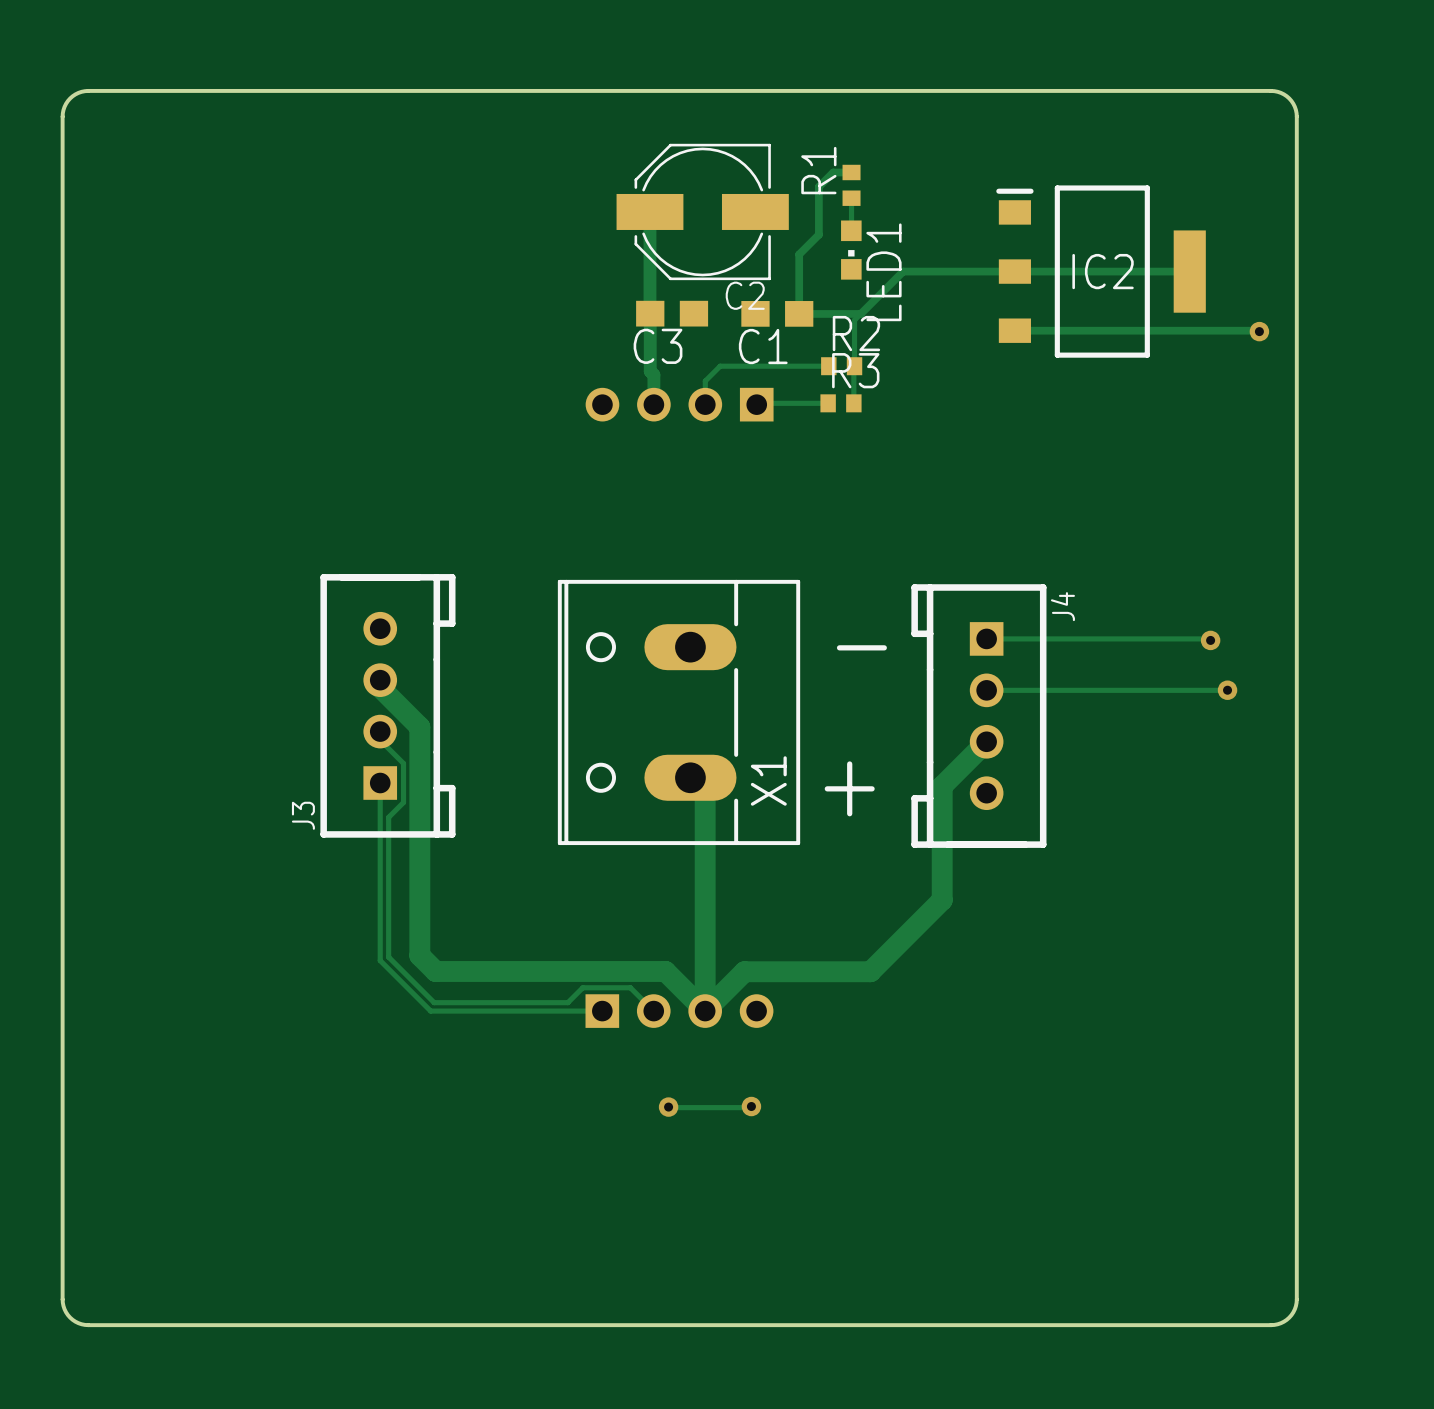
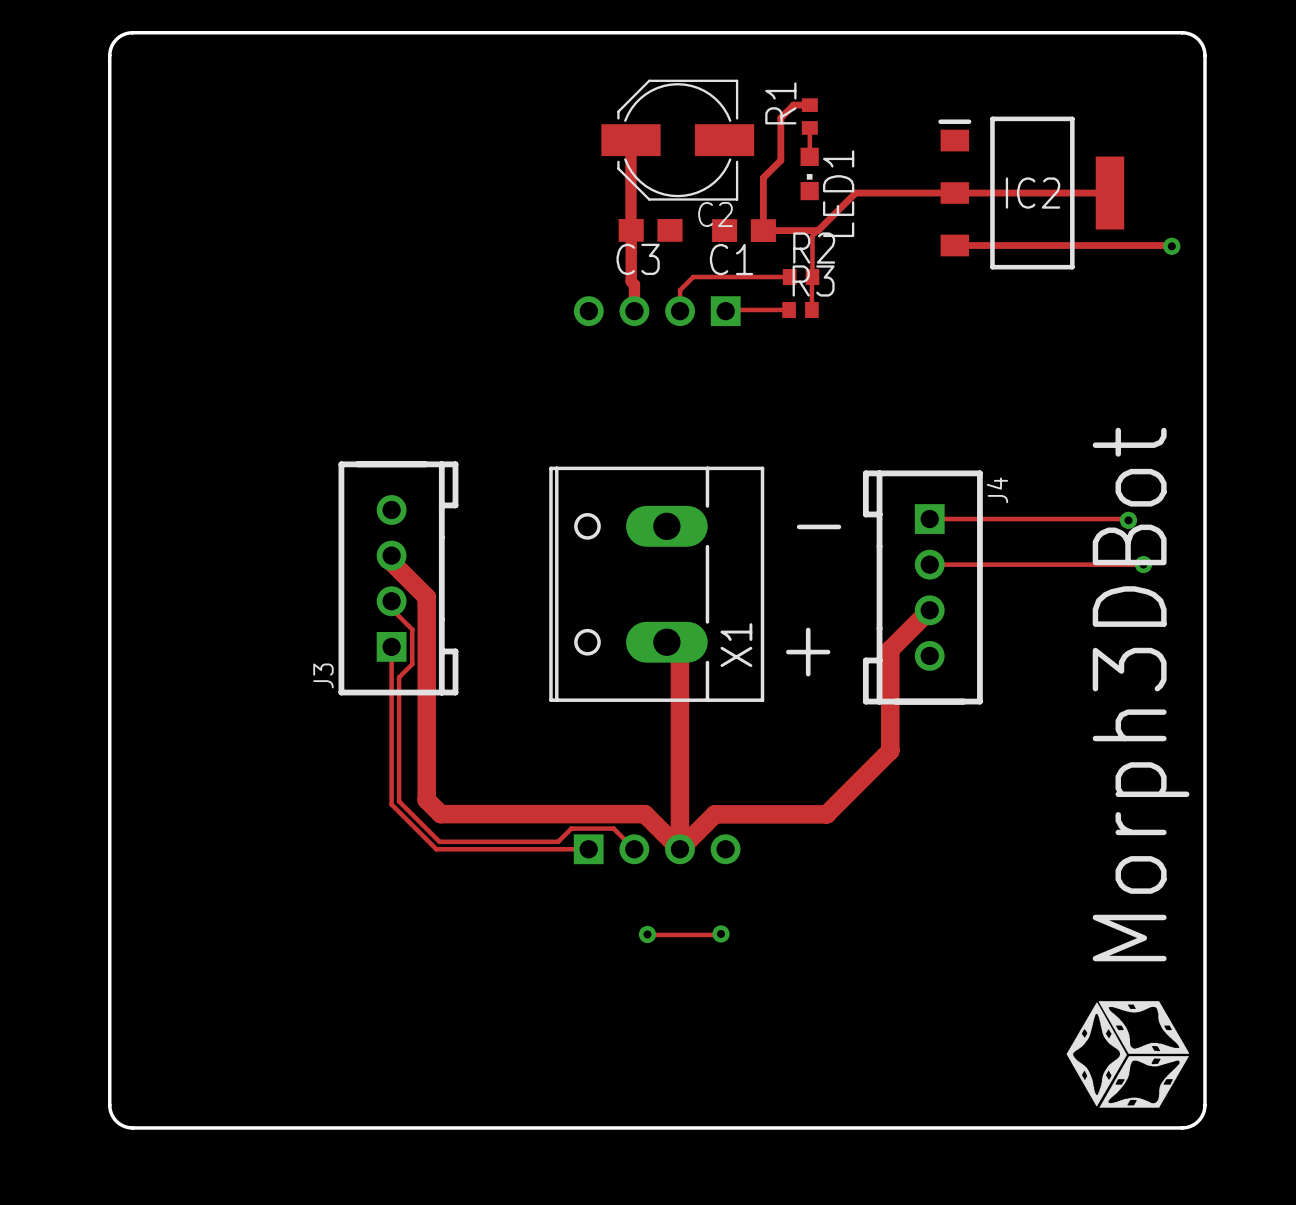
drawing: none -> [1066, 1001, 1190, 1108]

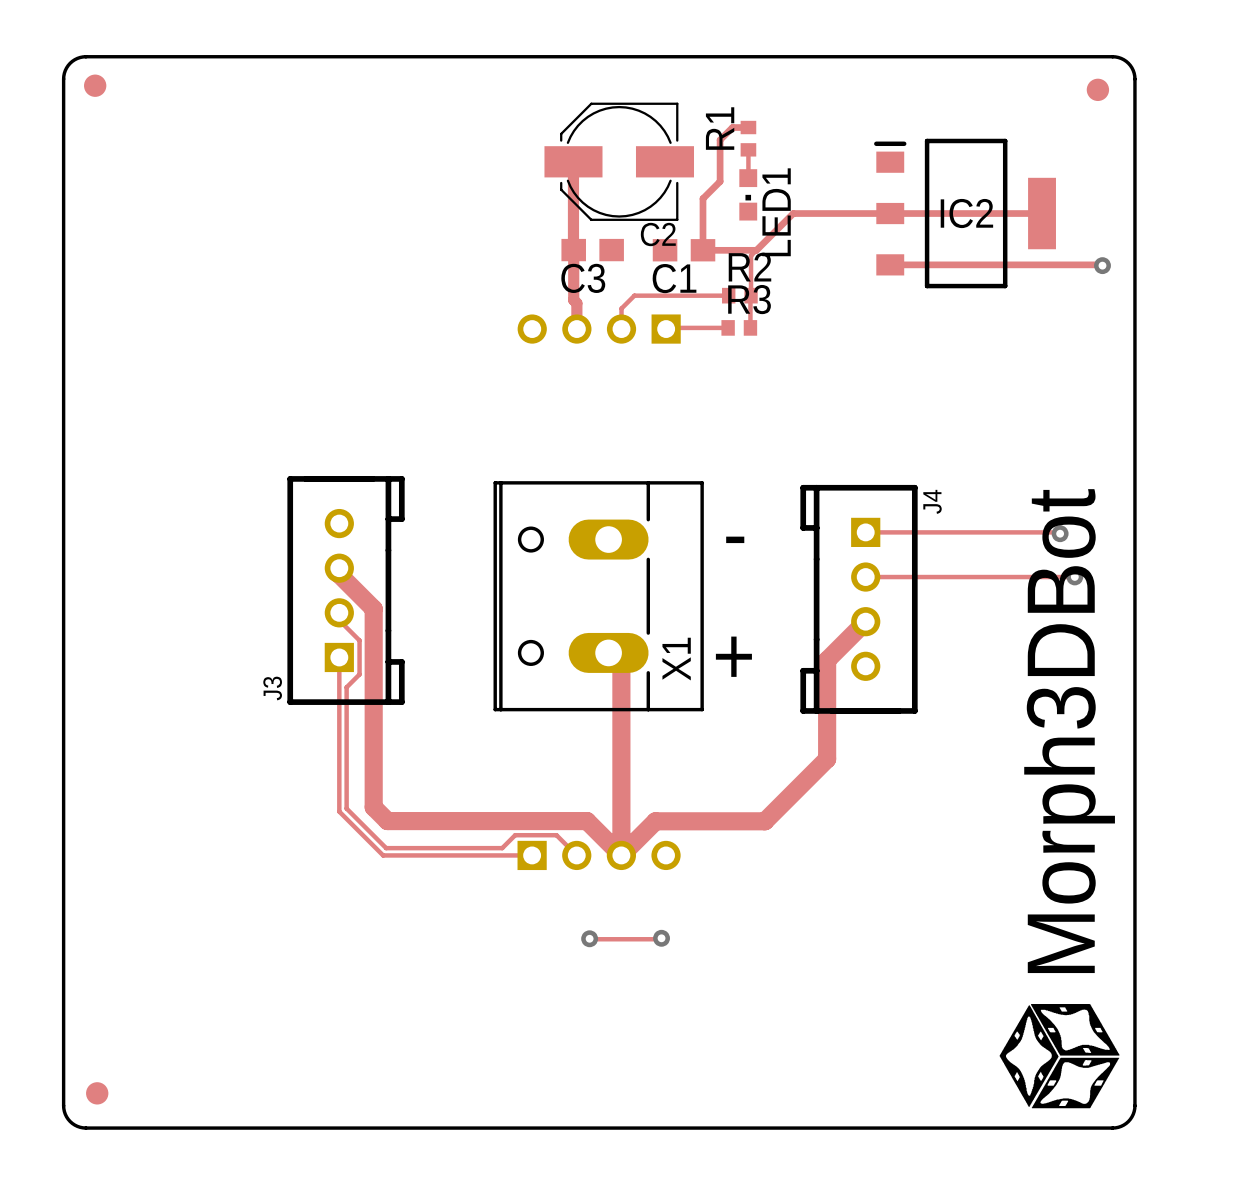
part: none -> (95, 85)
part: none -> (1097, 89)
part: none -> (97, 1093)

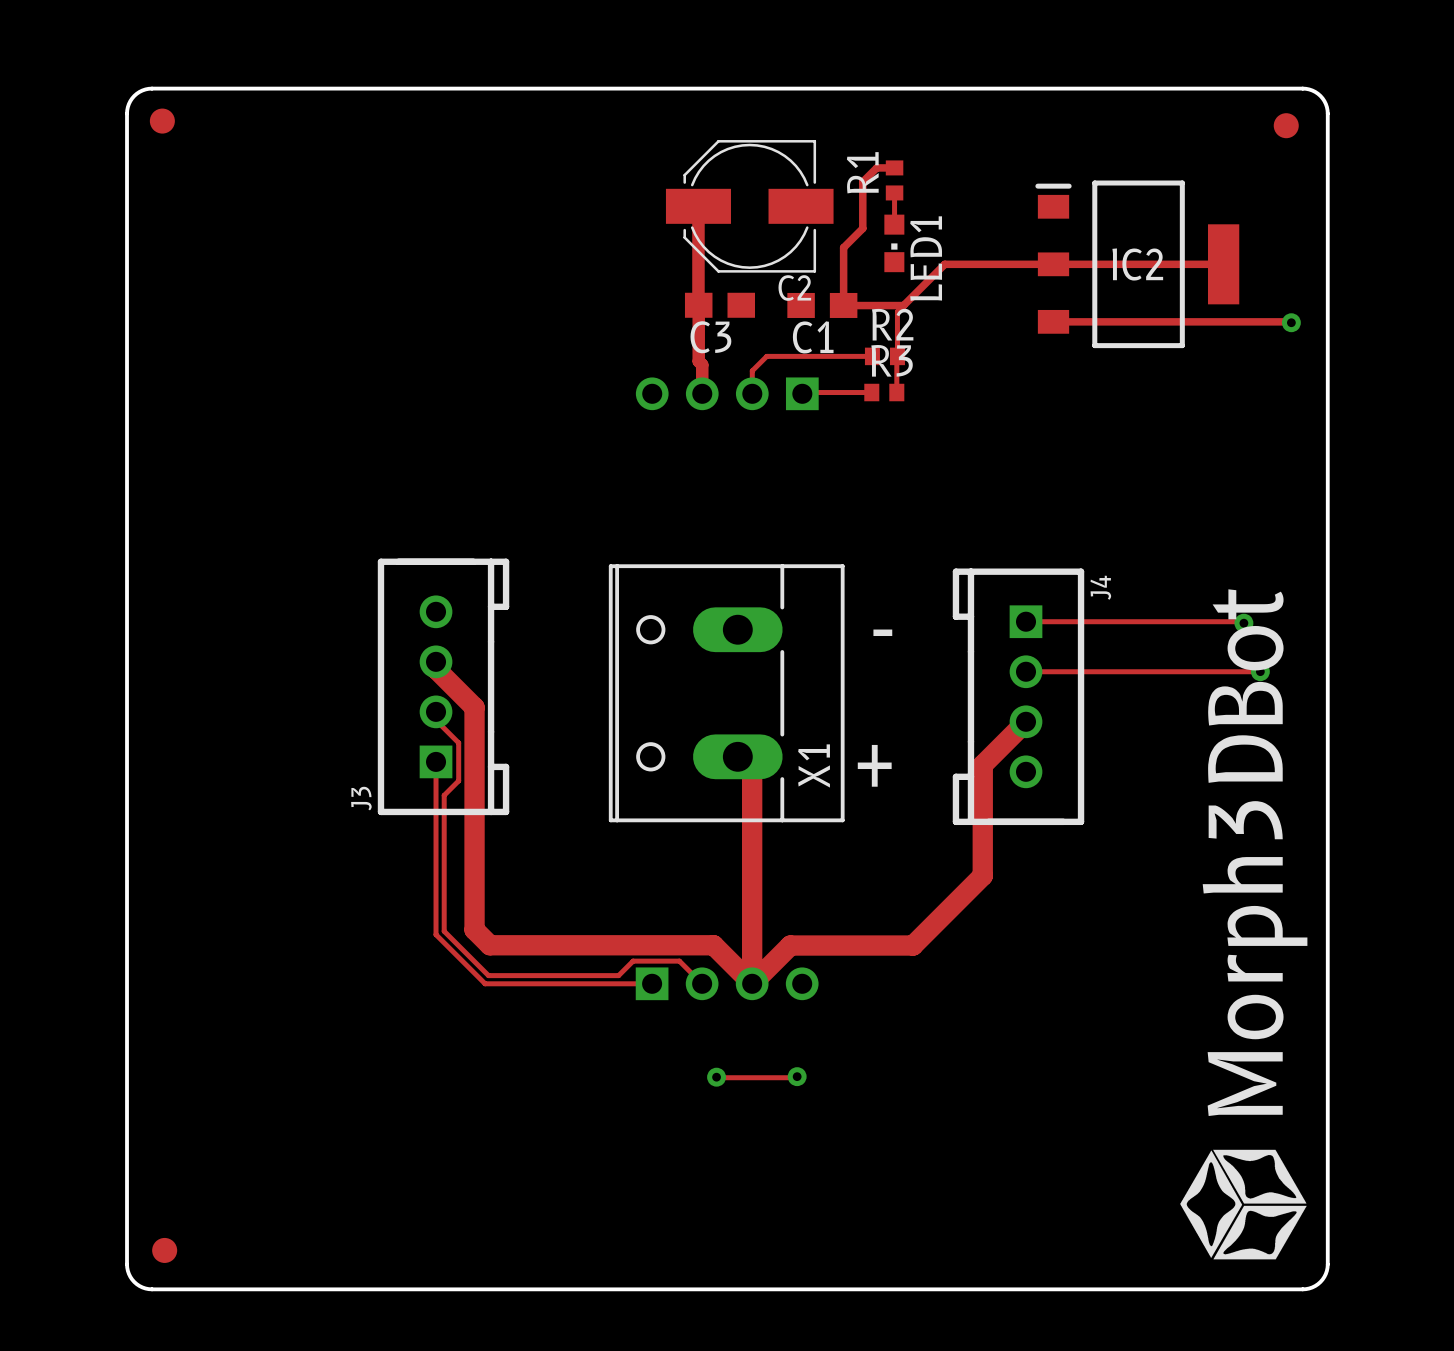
drawing shape: [999, 489, 1120, 1109] -> [1180, 589, 1308, 1260]

